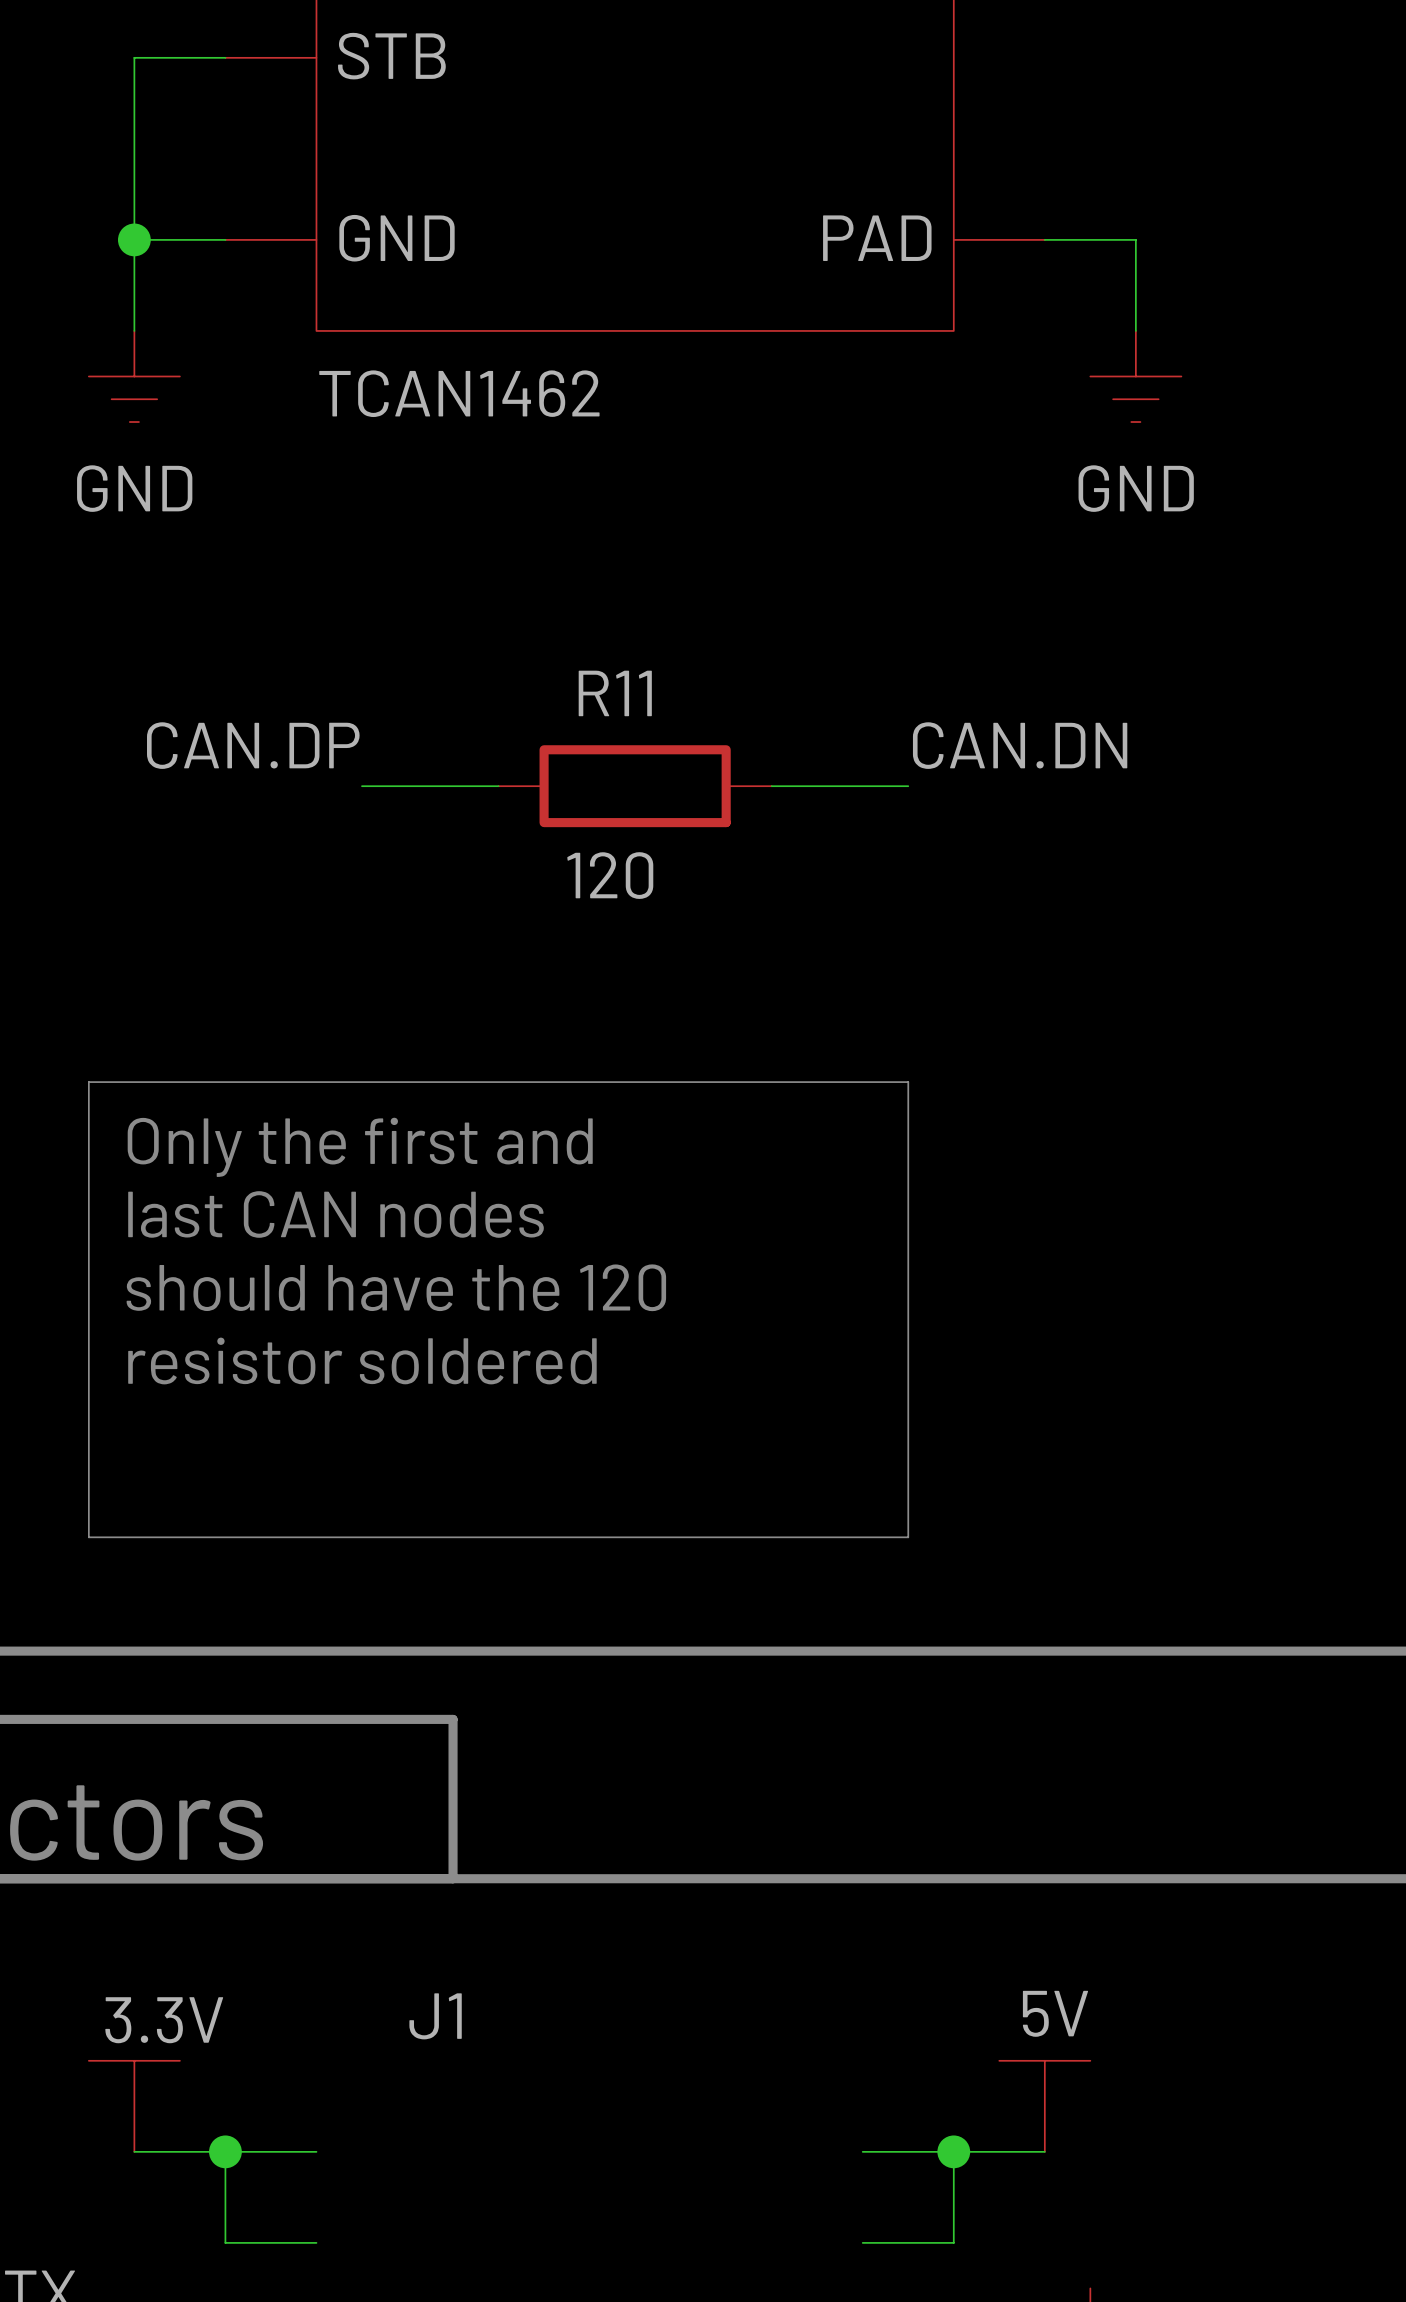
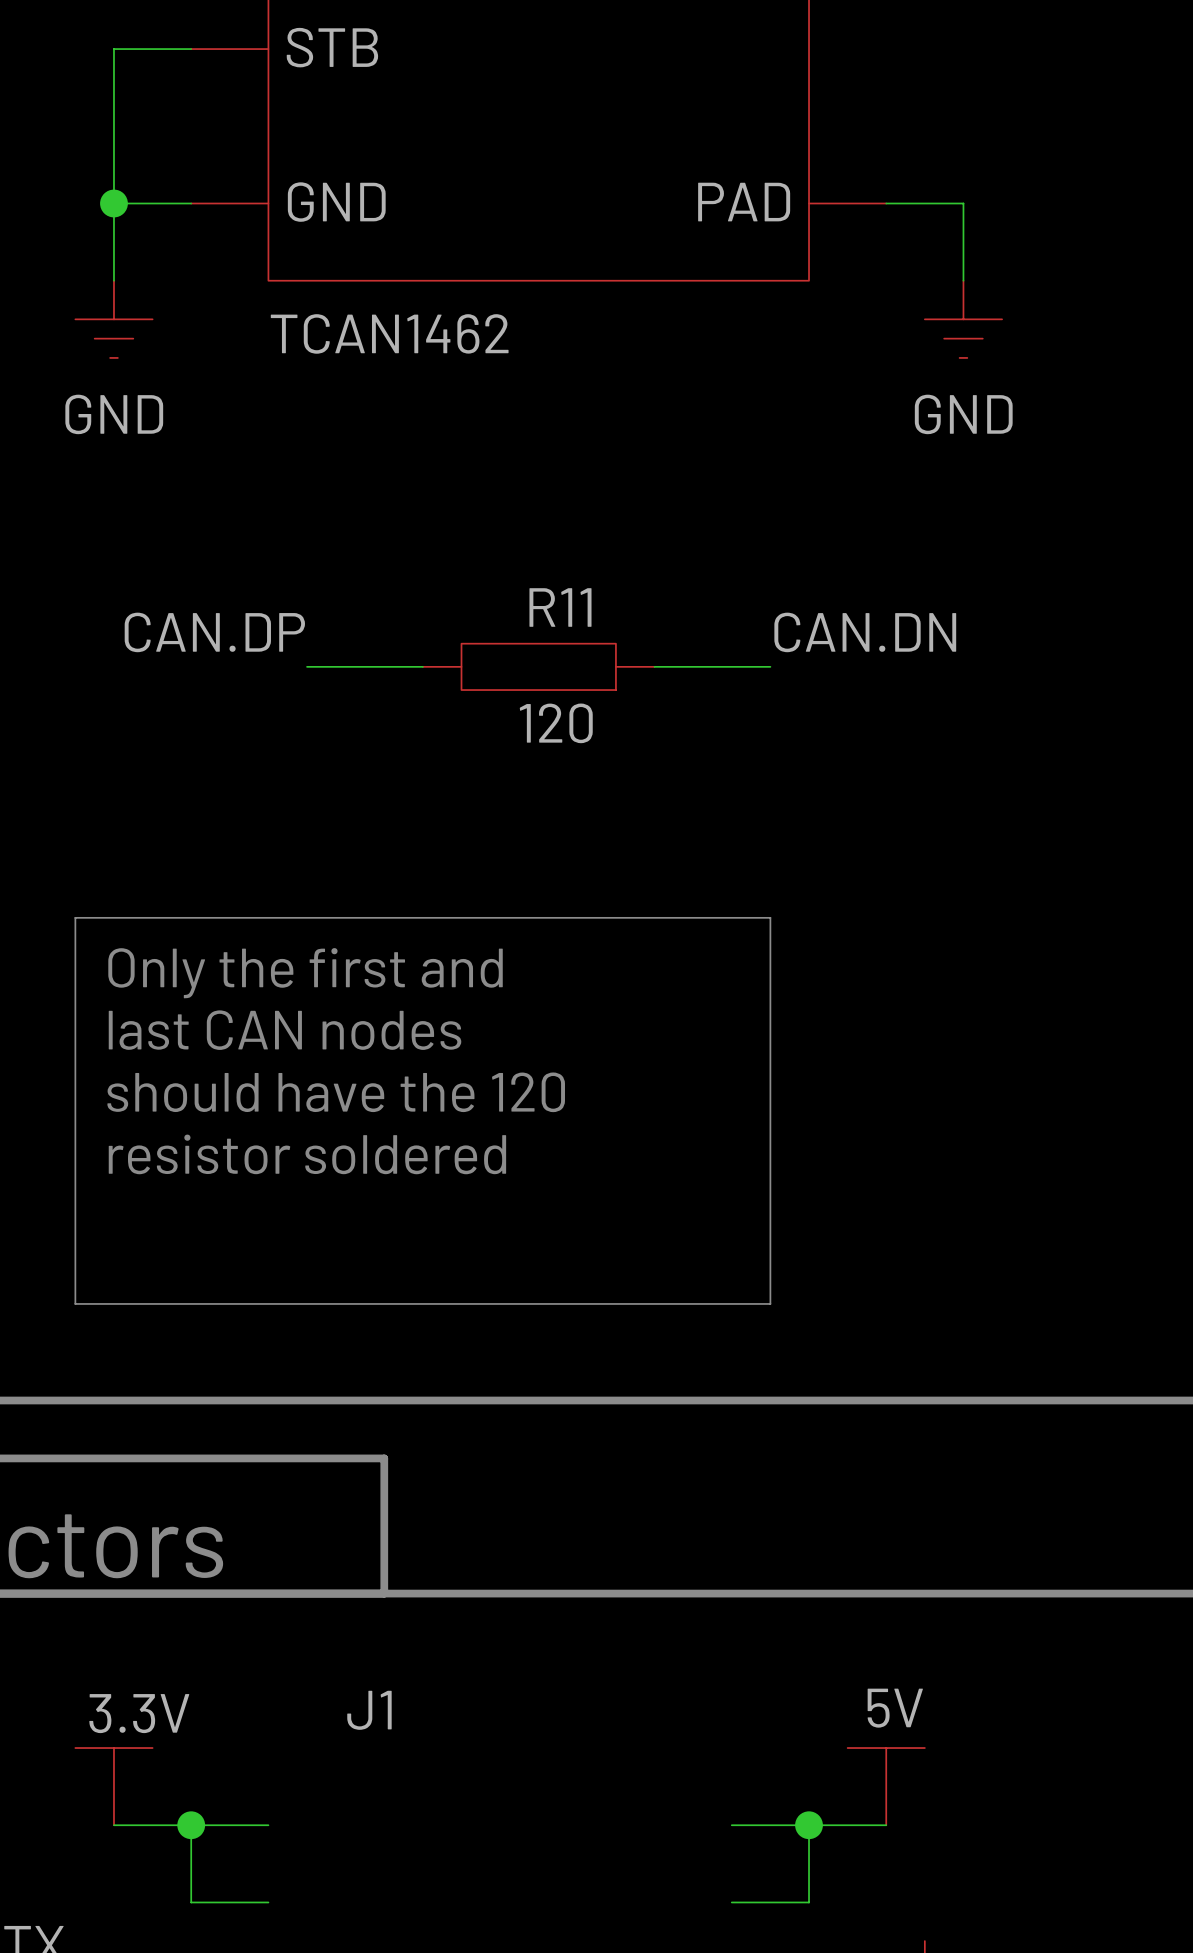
R11 name position: R11 (615, 693) -> R11 (560, 607)
R11 symbol: [498, 745, 772, 828] -> [422, 643, 655, 691]
R11 value position: 120 (610, 875) -> 120 (556, 723)

